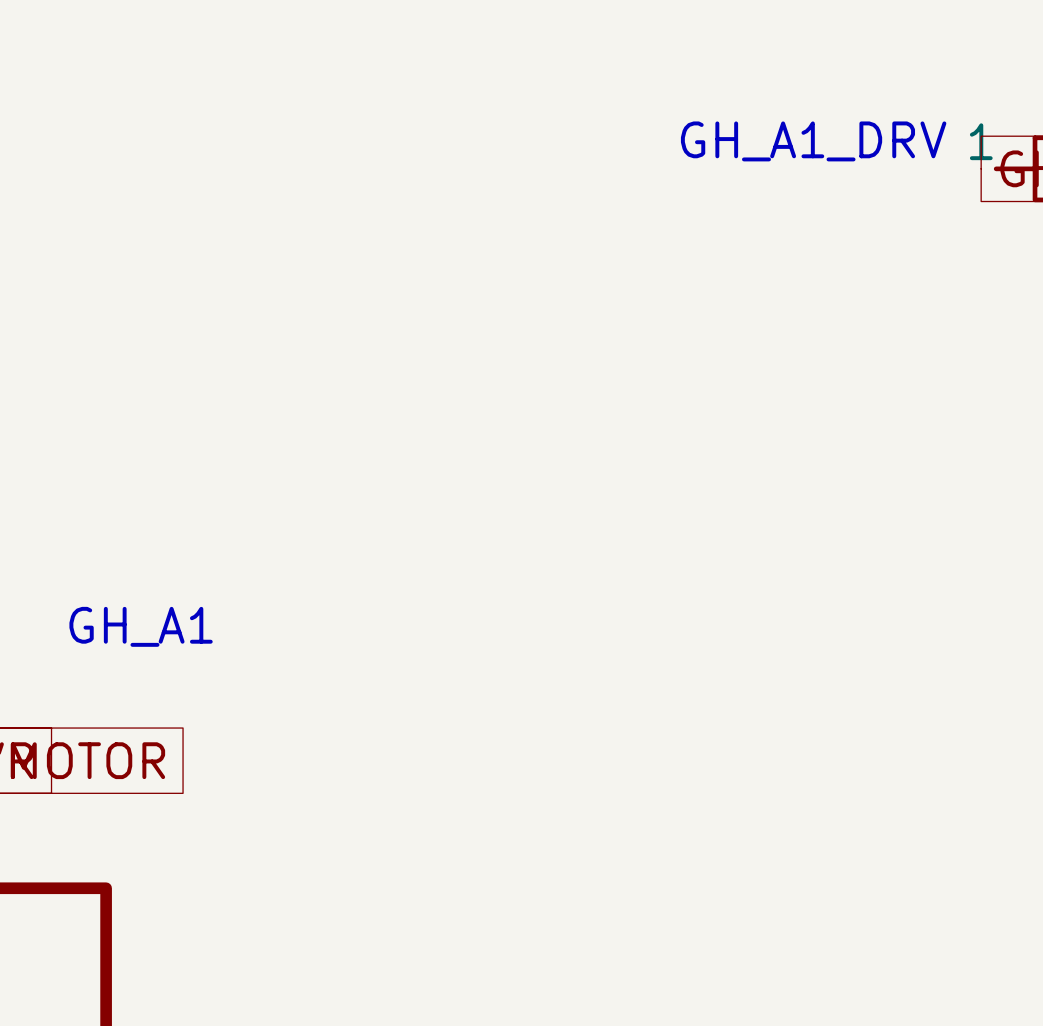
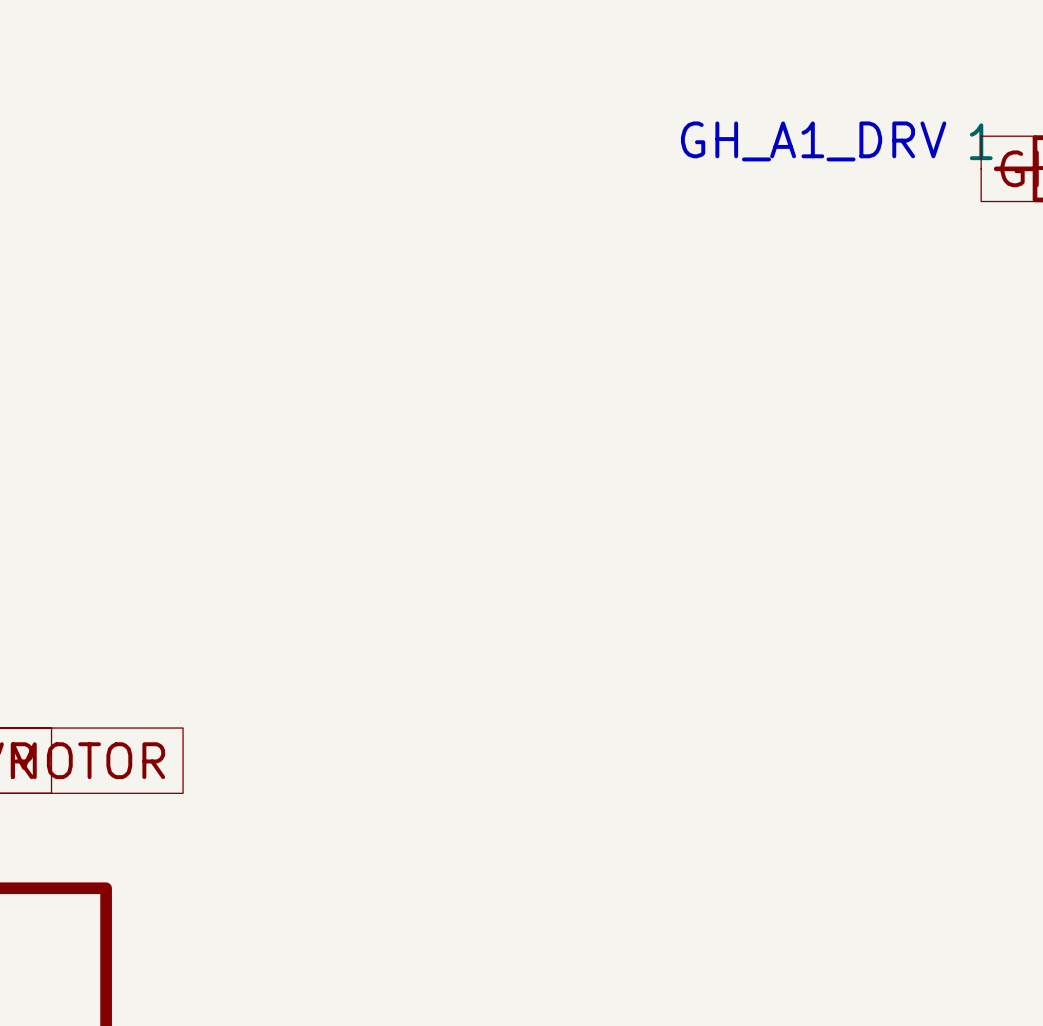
text: GH_A1 (141, 626) -> none

